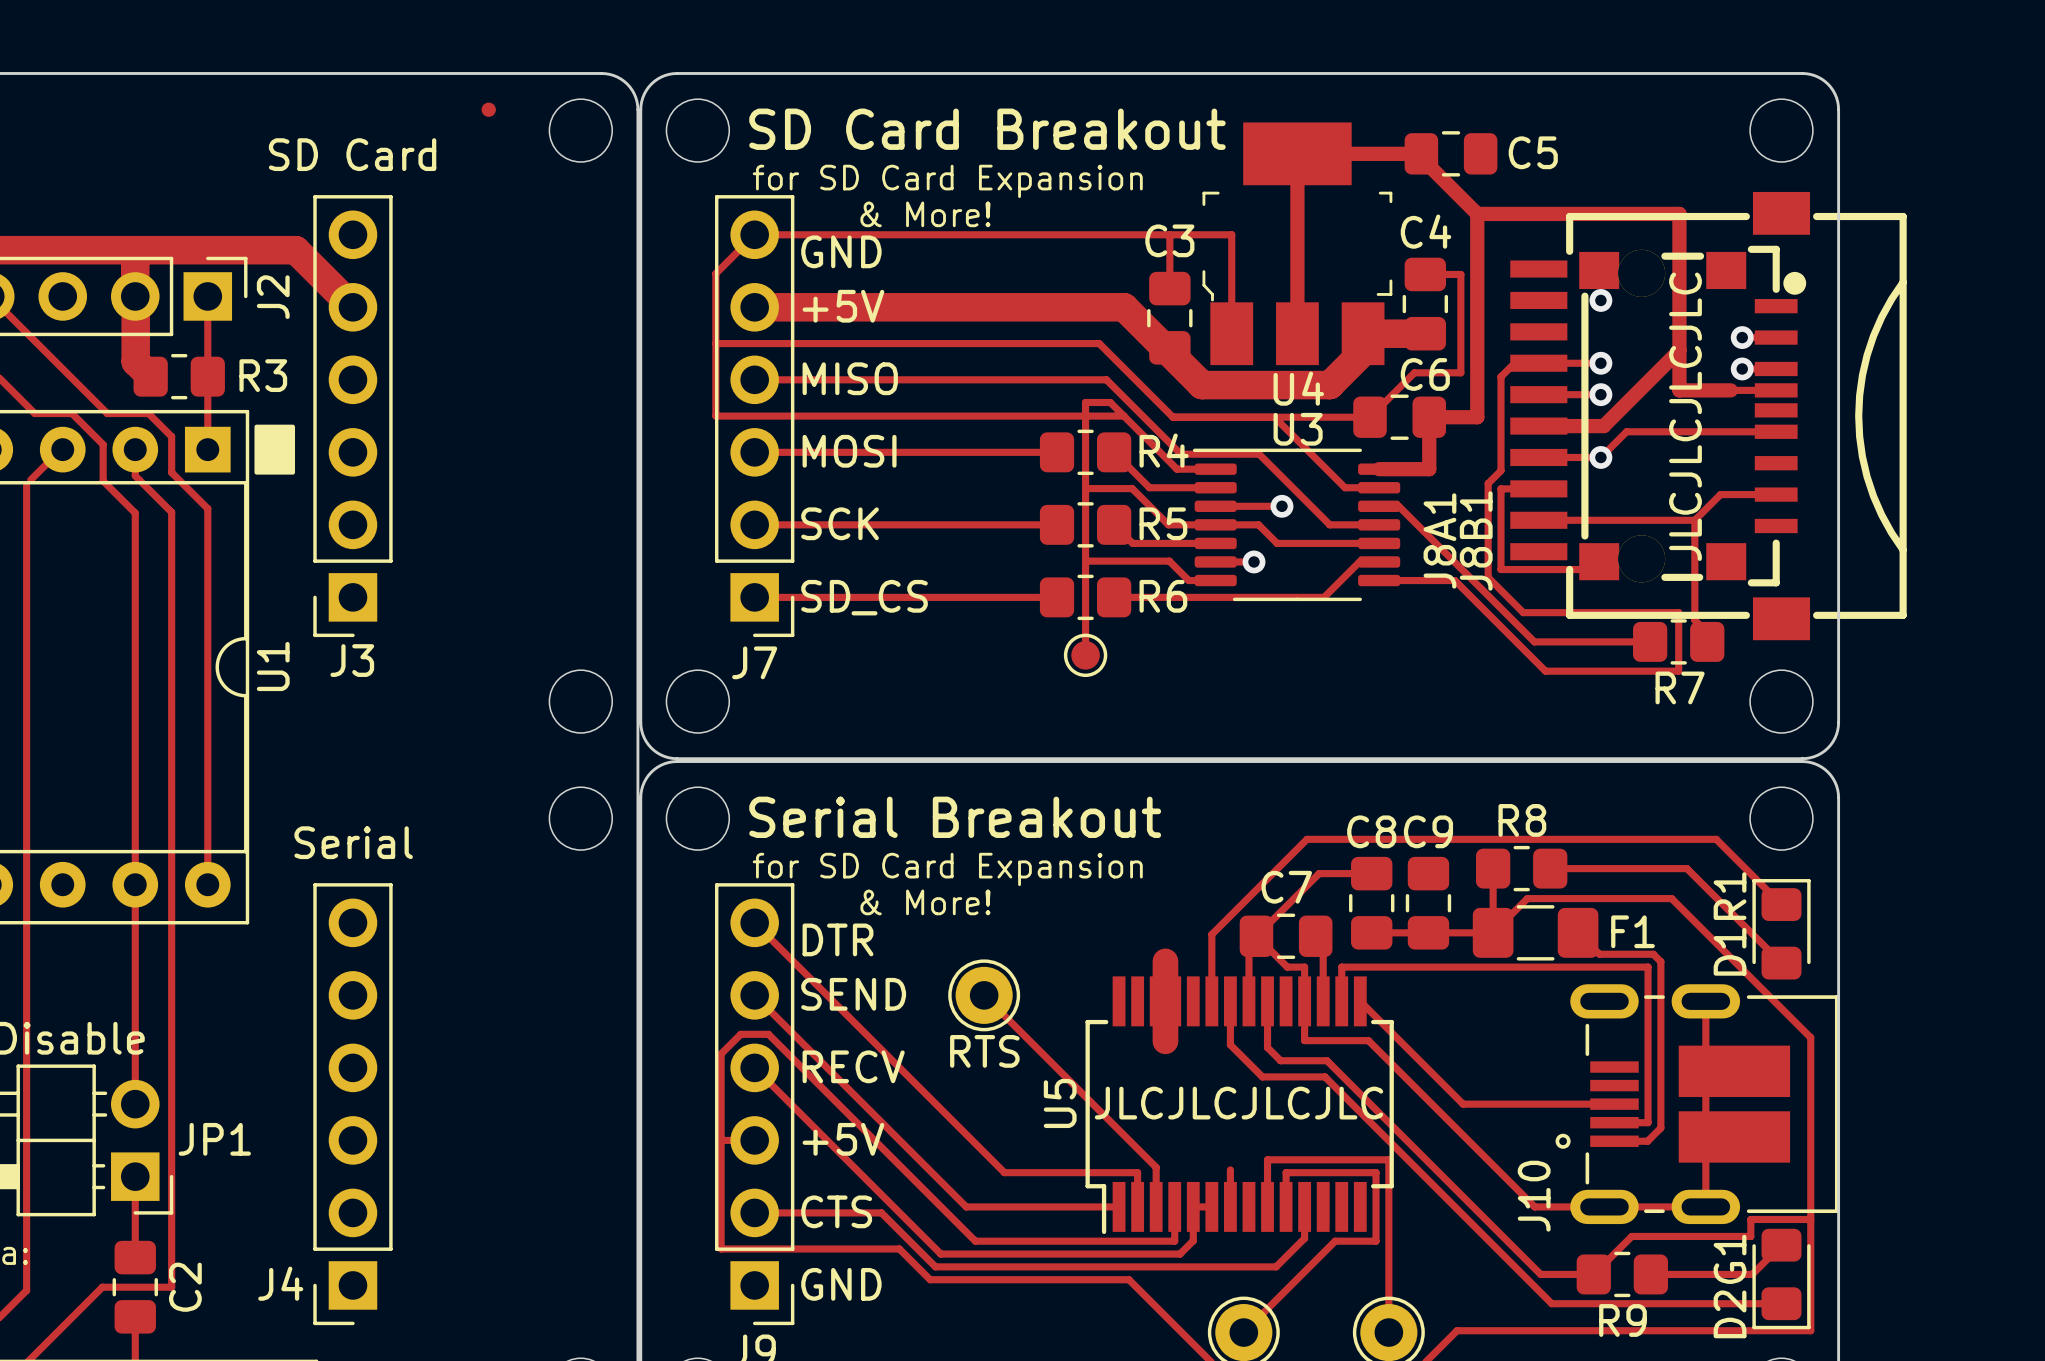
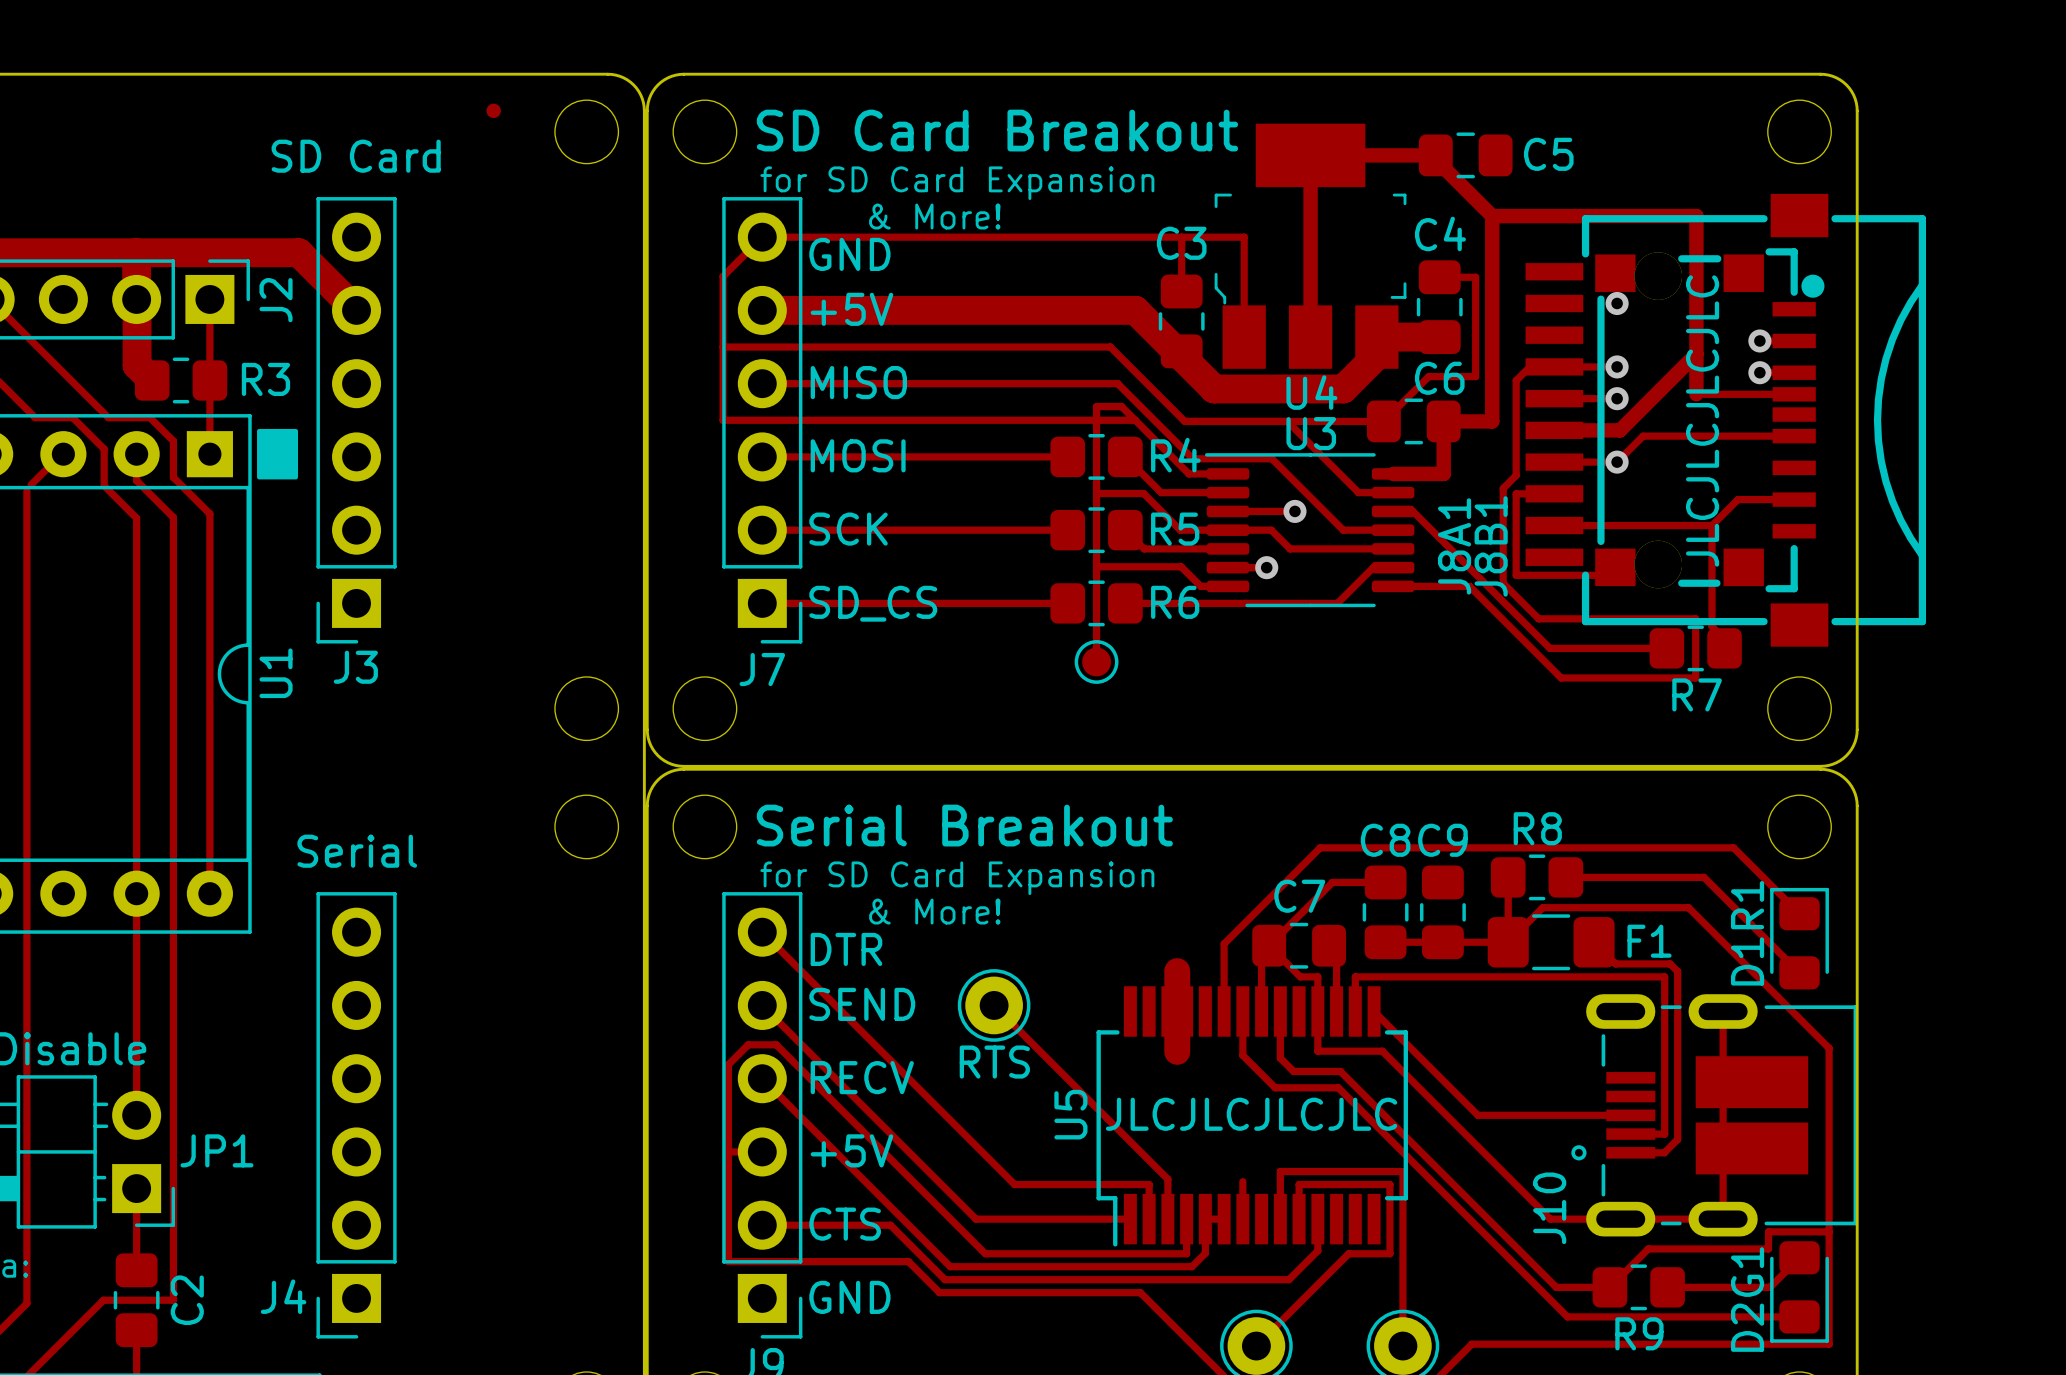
track width: thick (1679, 390) (1730, 390) -> thin (1696, 394) (1748, 394)

